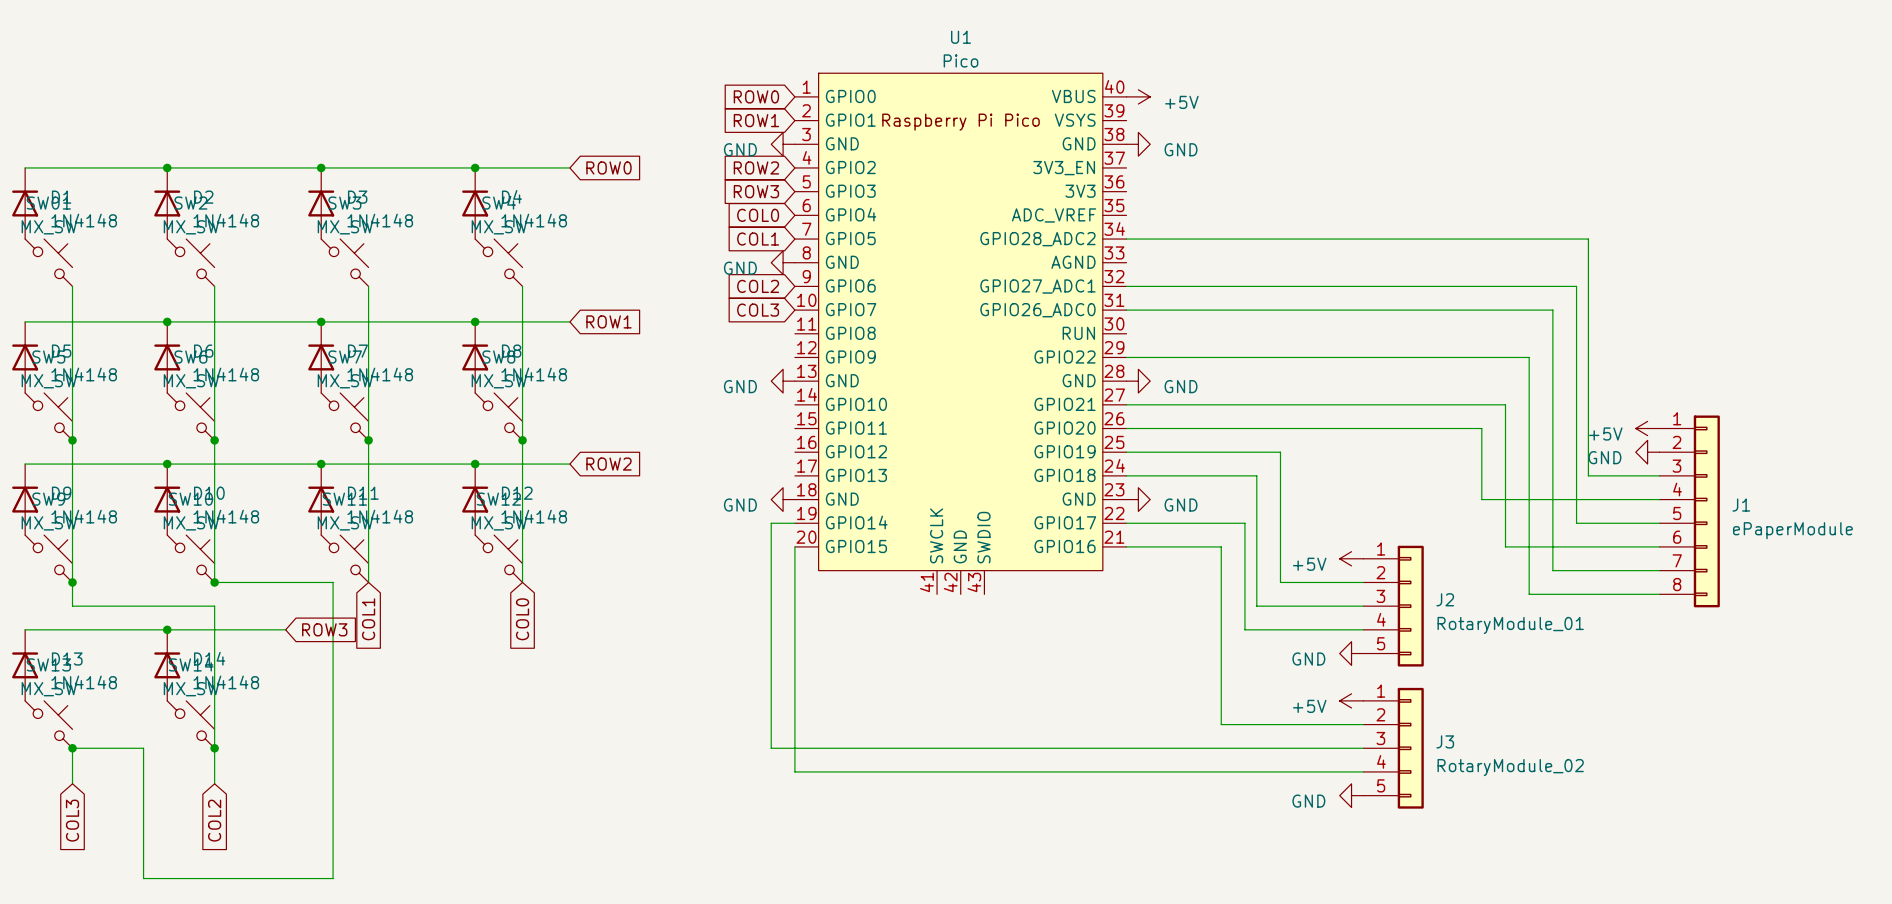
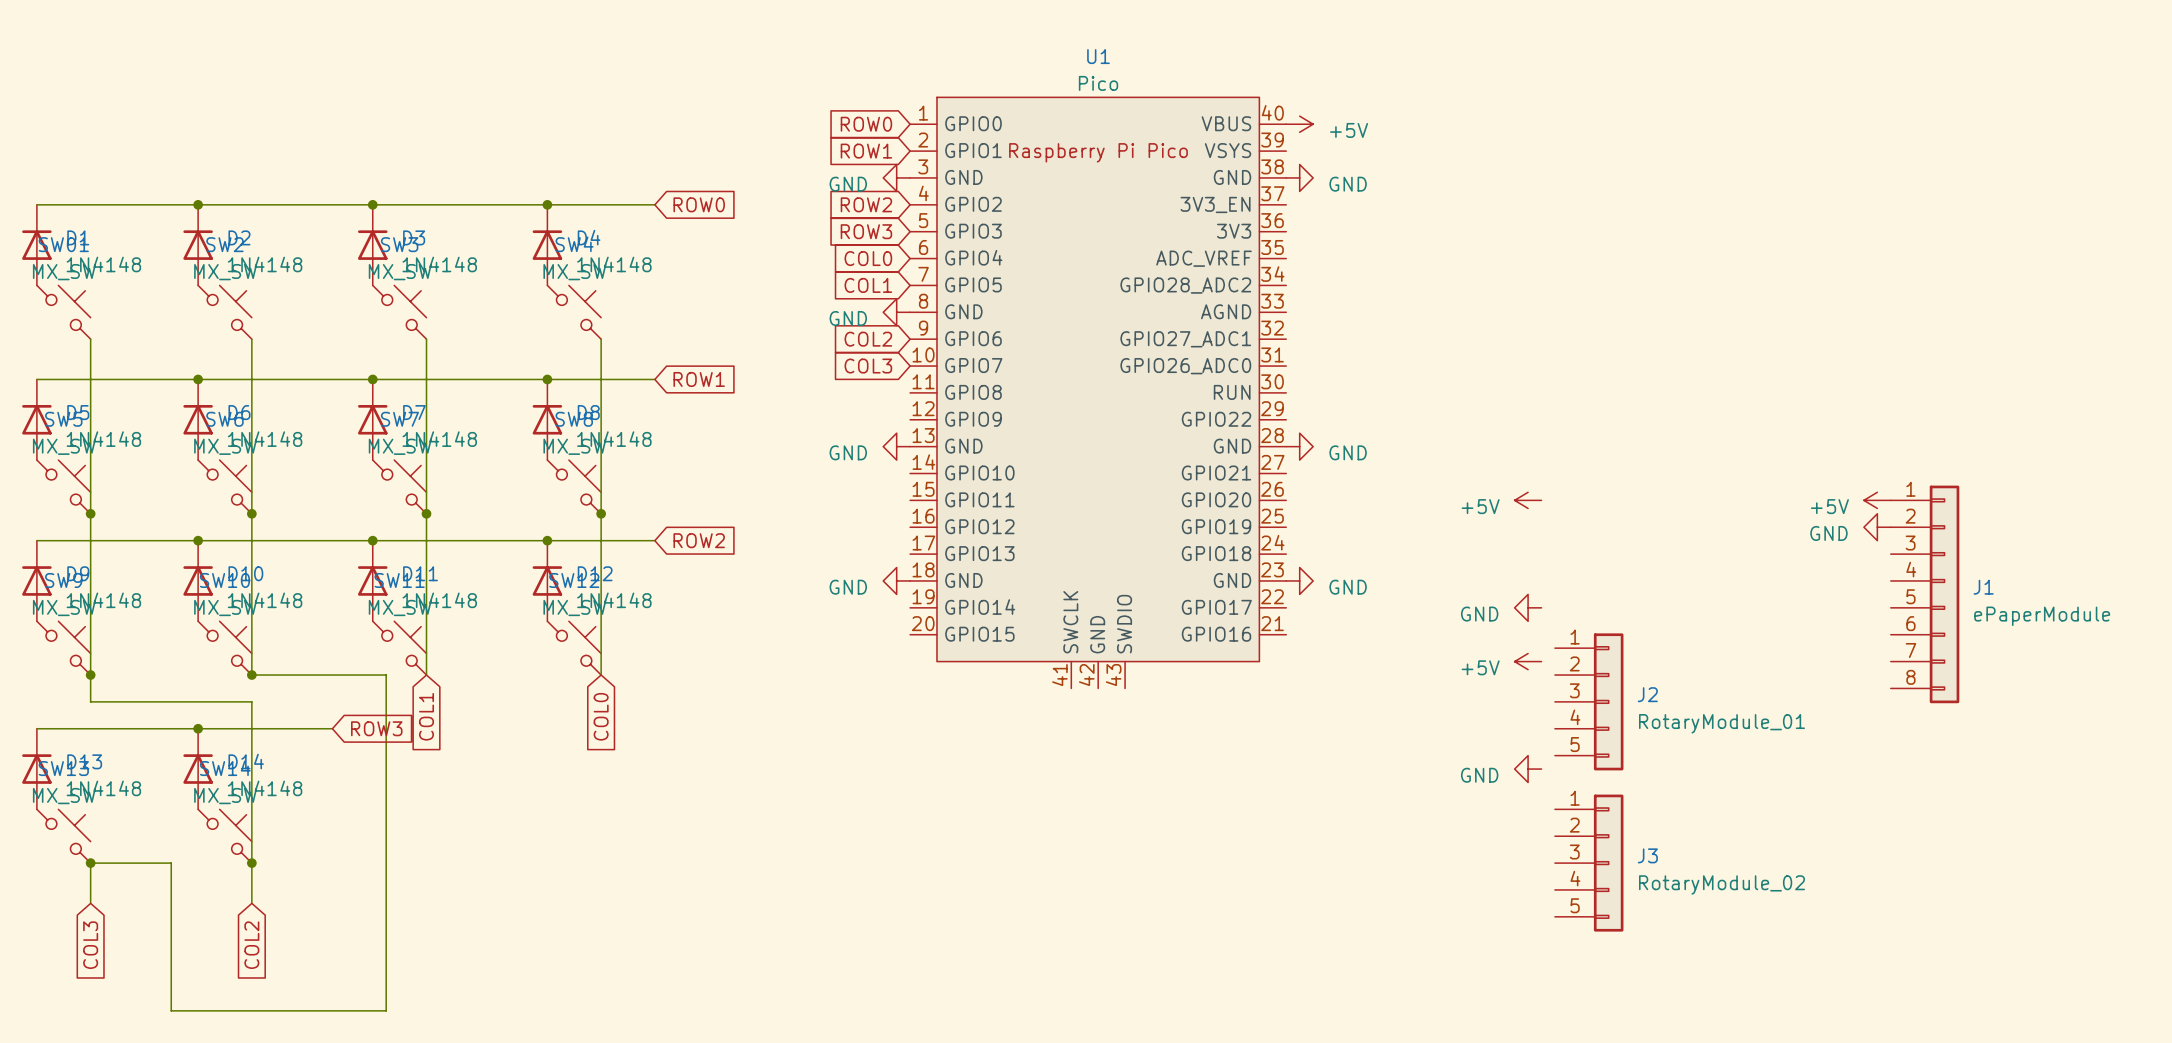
wire: (1126, 239) (1588, 239) (1588, 475) (1659, 475) -> none
wire: (1126, 286) (1576, 286) (1576, 523) (1659, 523) -> none
wire: (1126, 310) (1552, 310) (1552, 570) (1659, 570) -> none
wire: (1126, 357) (1529, 357) (1529, 594) (1659, 594) -> none
wire: (1126, 404) (1505, 404) (1505, 546) (1659, 546) -> none
wire: (1126, 428) (1481, 428) (1481, 499) (1659, 499) -> none
power symbol: none -> +5V (1528, 500)
wire: (1126, 452) (1280, 452) (1280, 582) (1363, 582) -> none
wire: (1126, 475) (1256, 475) (1256, 606) (1363, 606) -> none
wire: (794, 523) (771, 523) (771, 748) (1363, 748) -> none
wire: (1126, 523) (1244, 523) (1244, 629) (1363, 629) -> none
power symbol: none -> GND (1528, 607)
wire: (794, 546) (794, 771) (1363, 771) -> none
wire: (1126, 546) (1221, 546) (1221, 724) (1363, 724) -> none
power symbol position: +5V (1351, 558) -> +5V (1528, 661)
power symbol position: GND (1351, 653) -> GND (1528, 769)
power symbol: +5V (1351, 700) -> none
power symbol: GND (1351, 795) -> none

